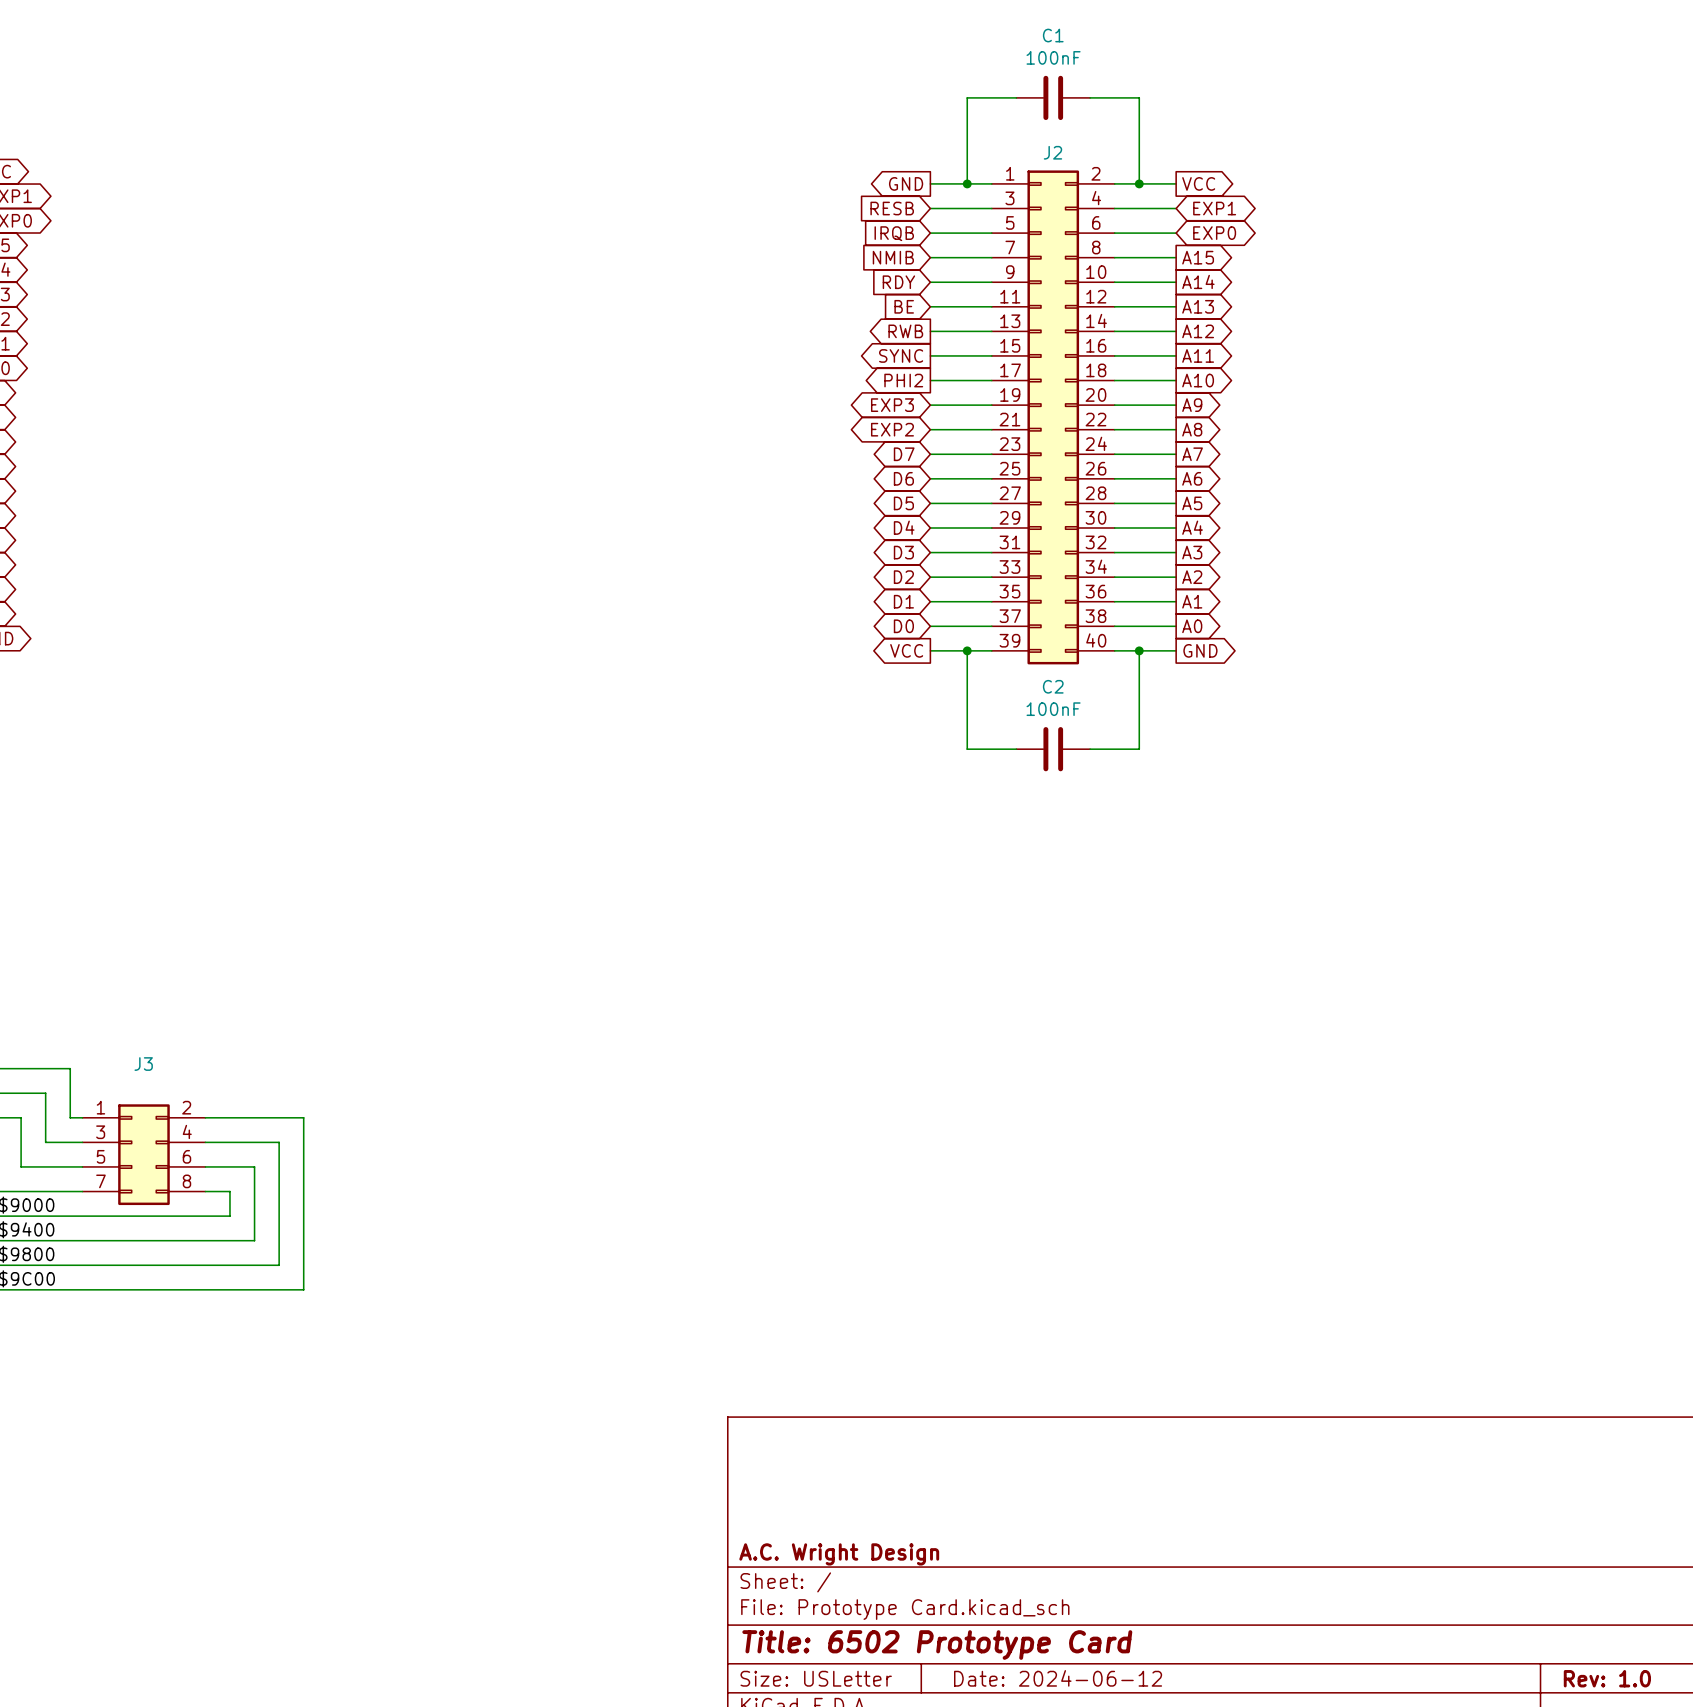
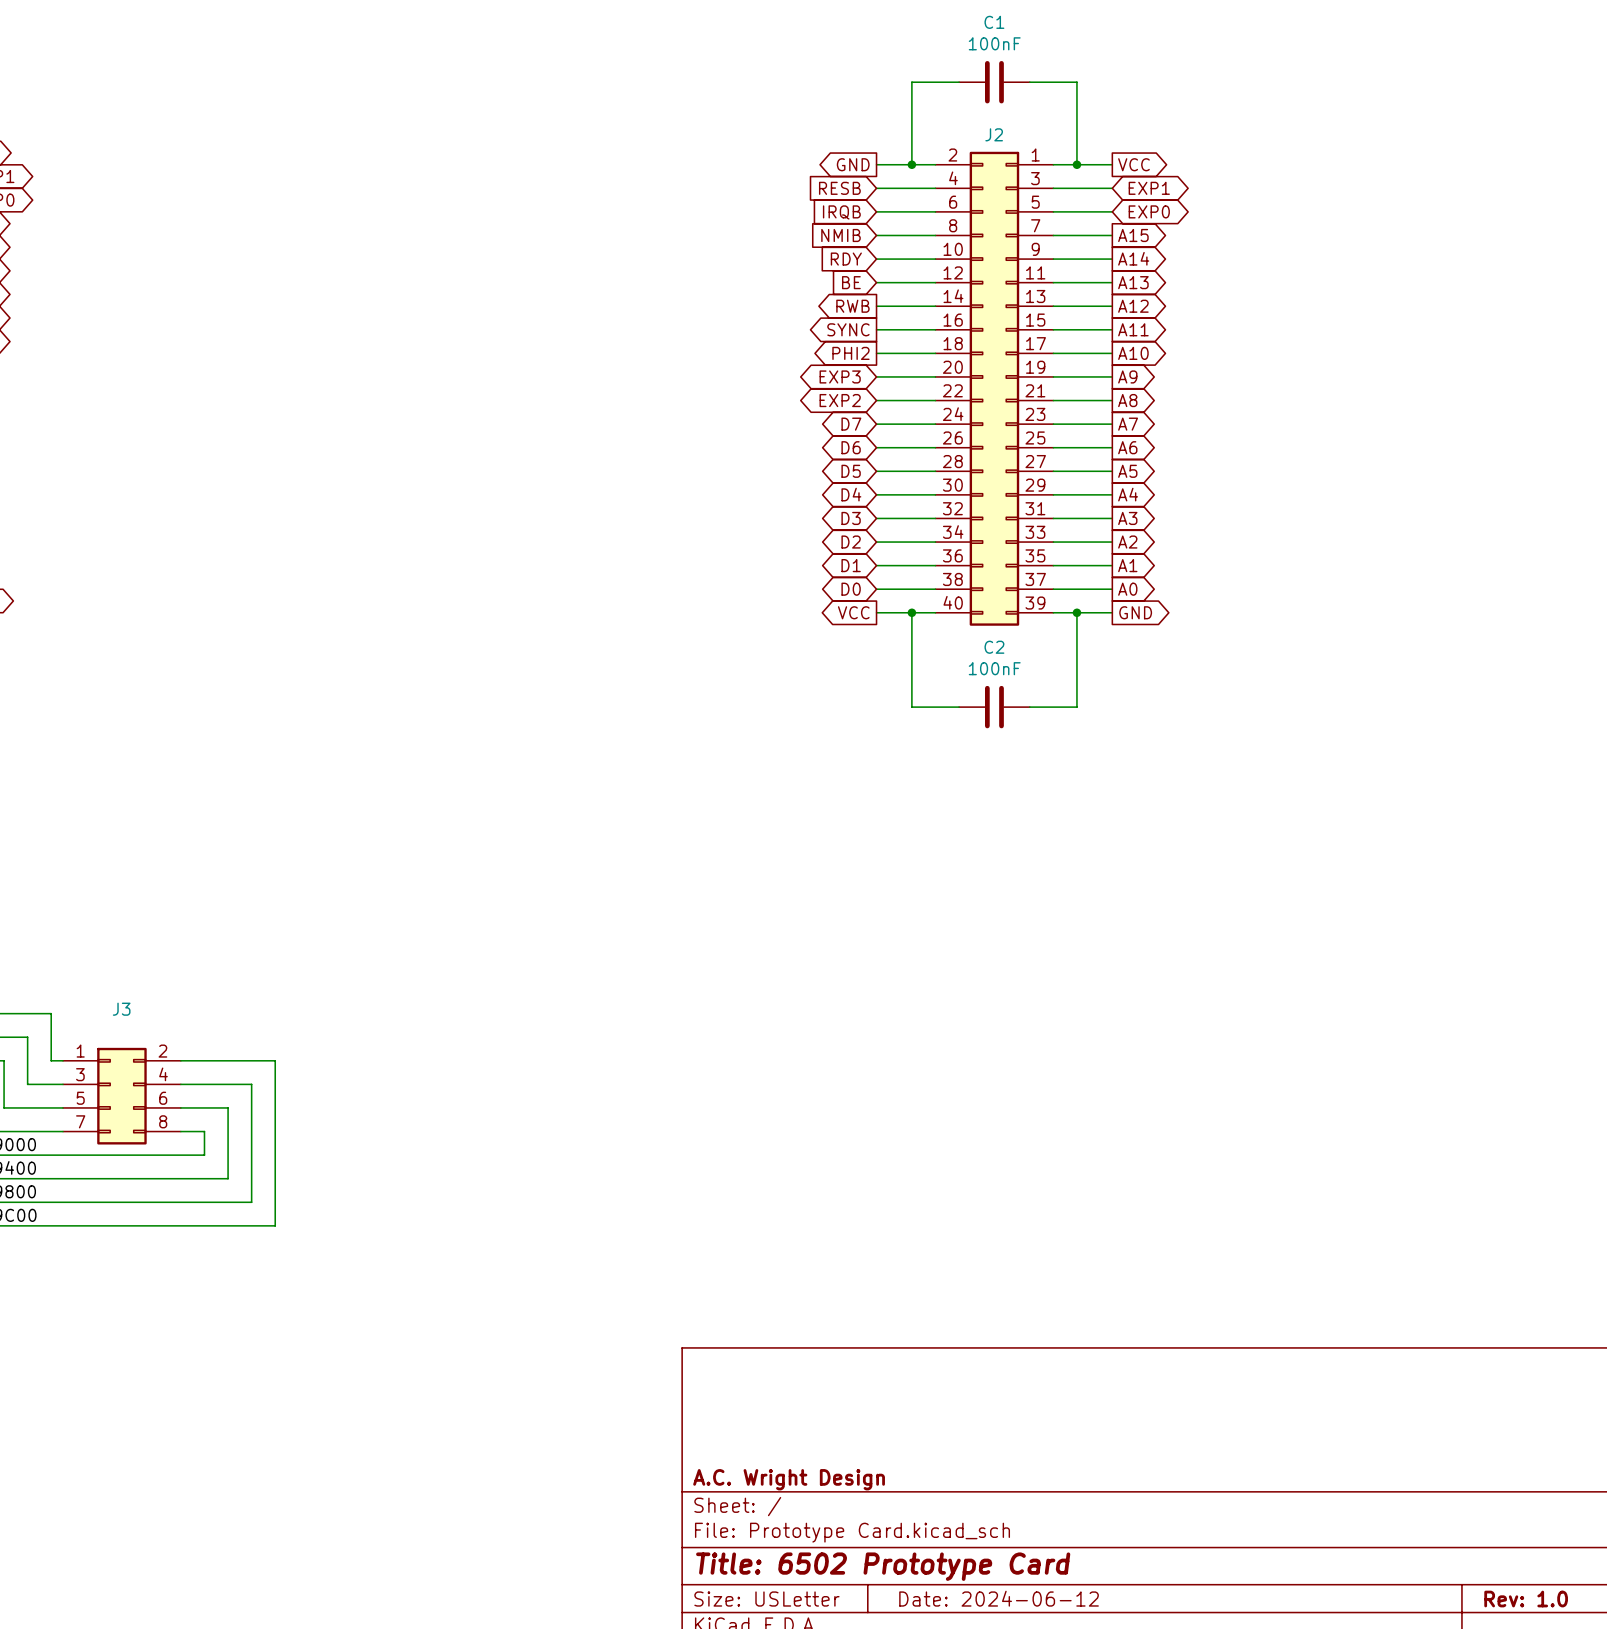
J2 flip: as is (1053, 417) -> left-right (994, 388)

